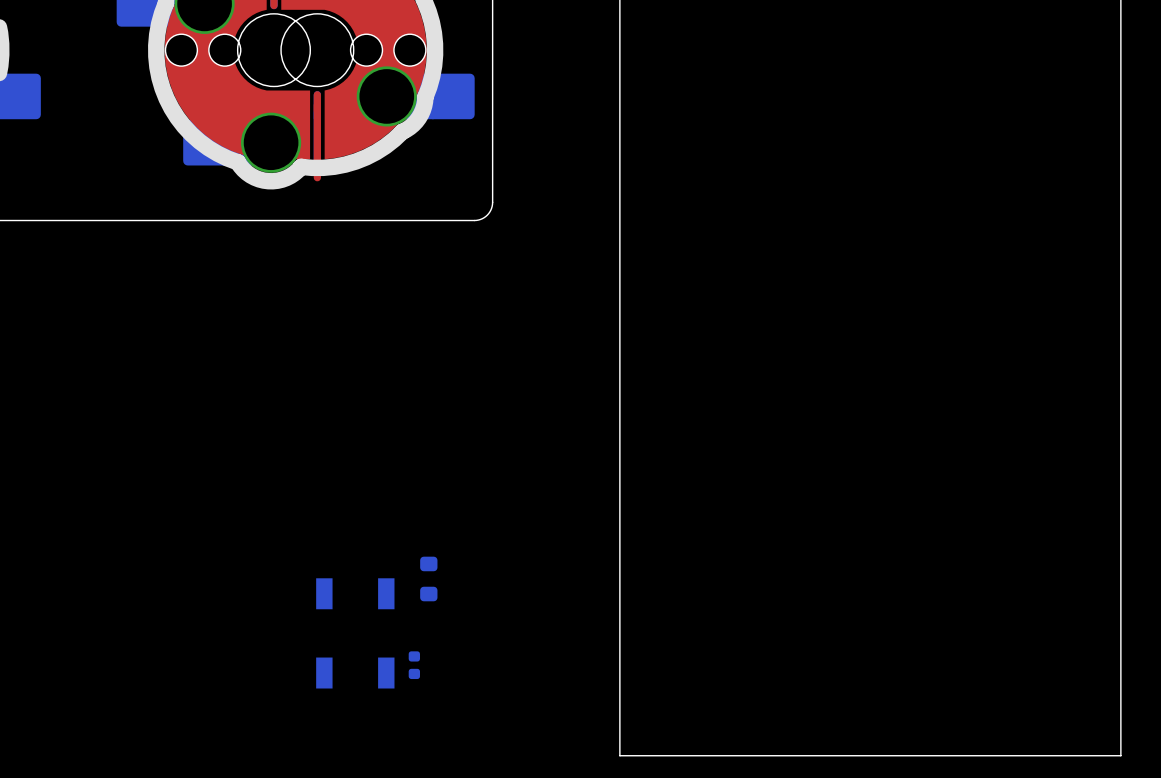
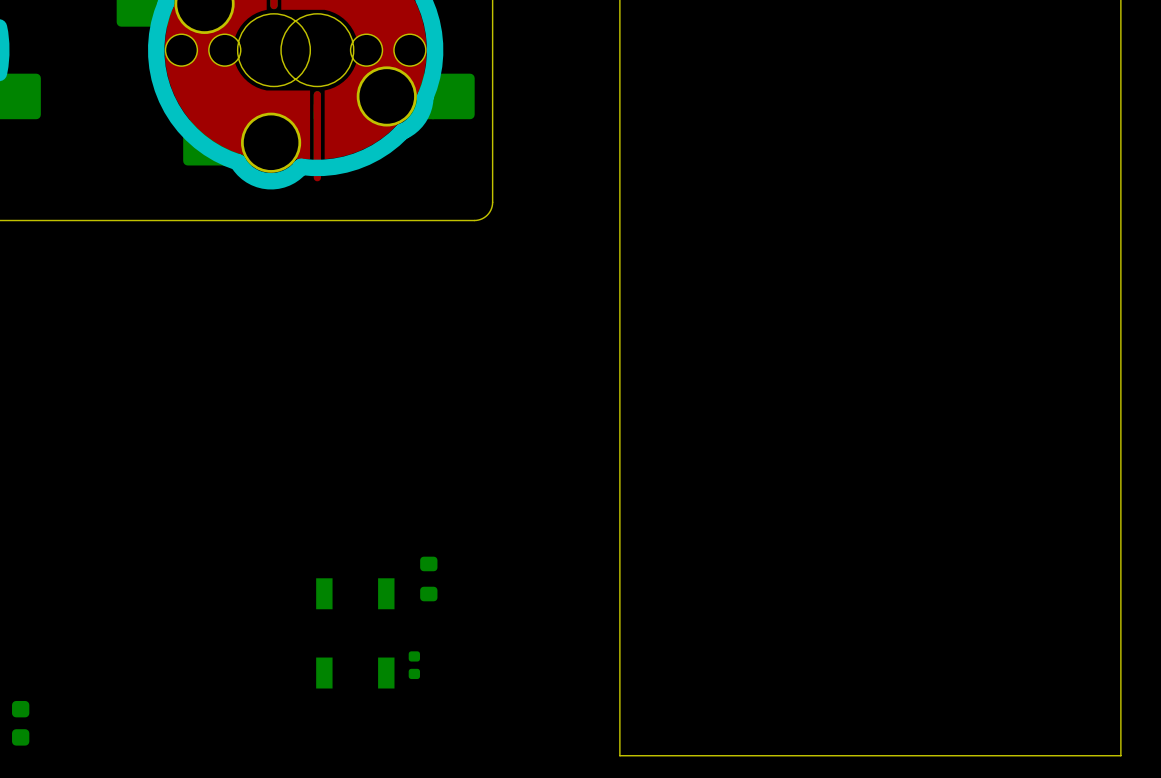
part: none -> (20, 723)

